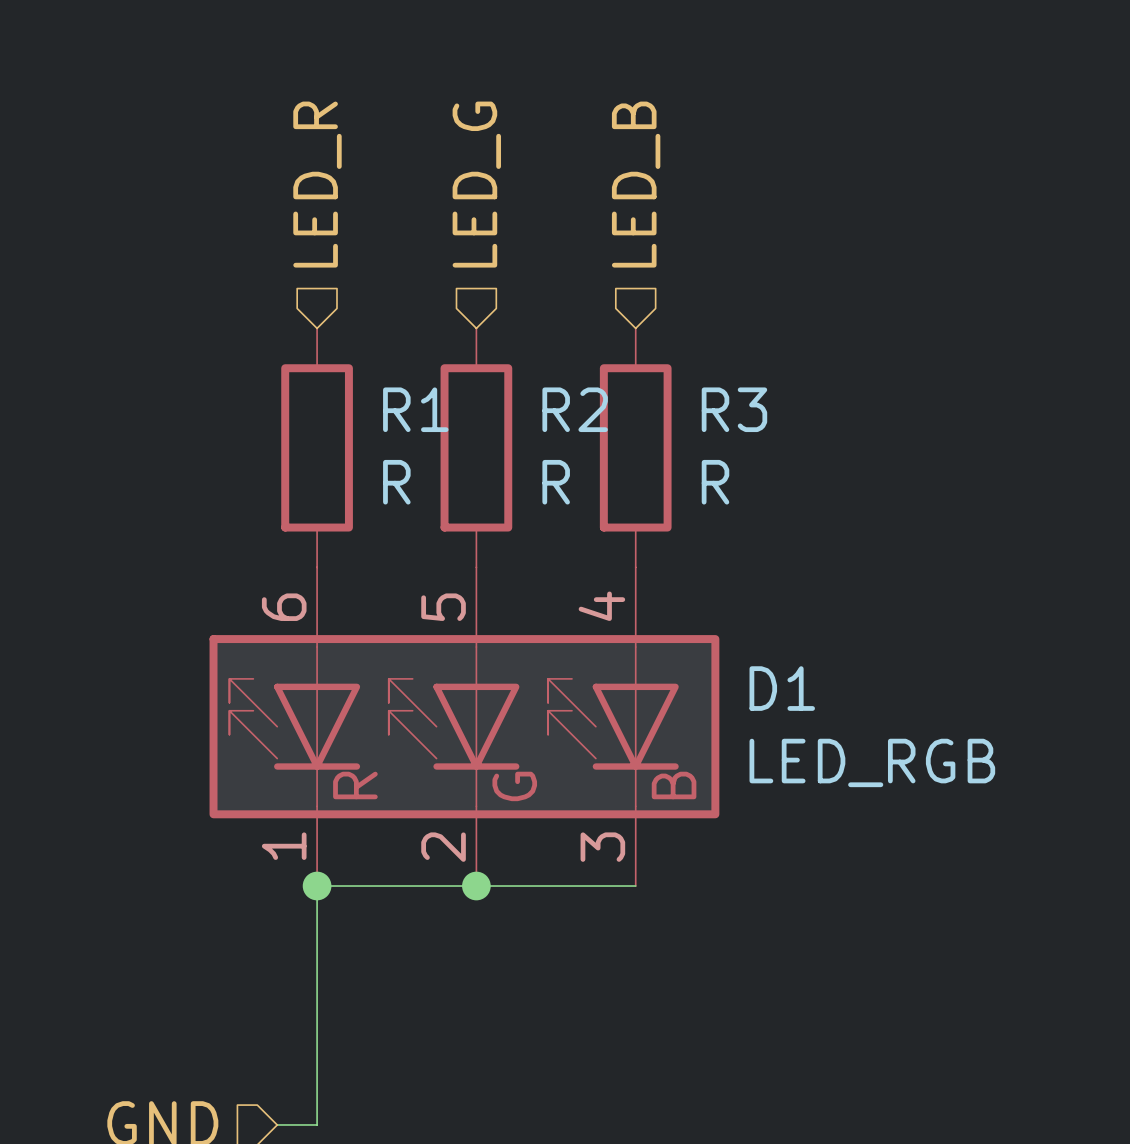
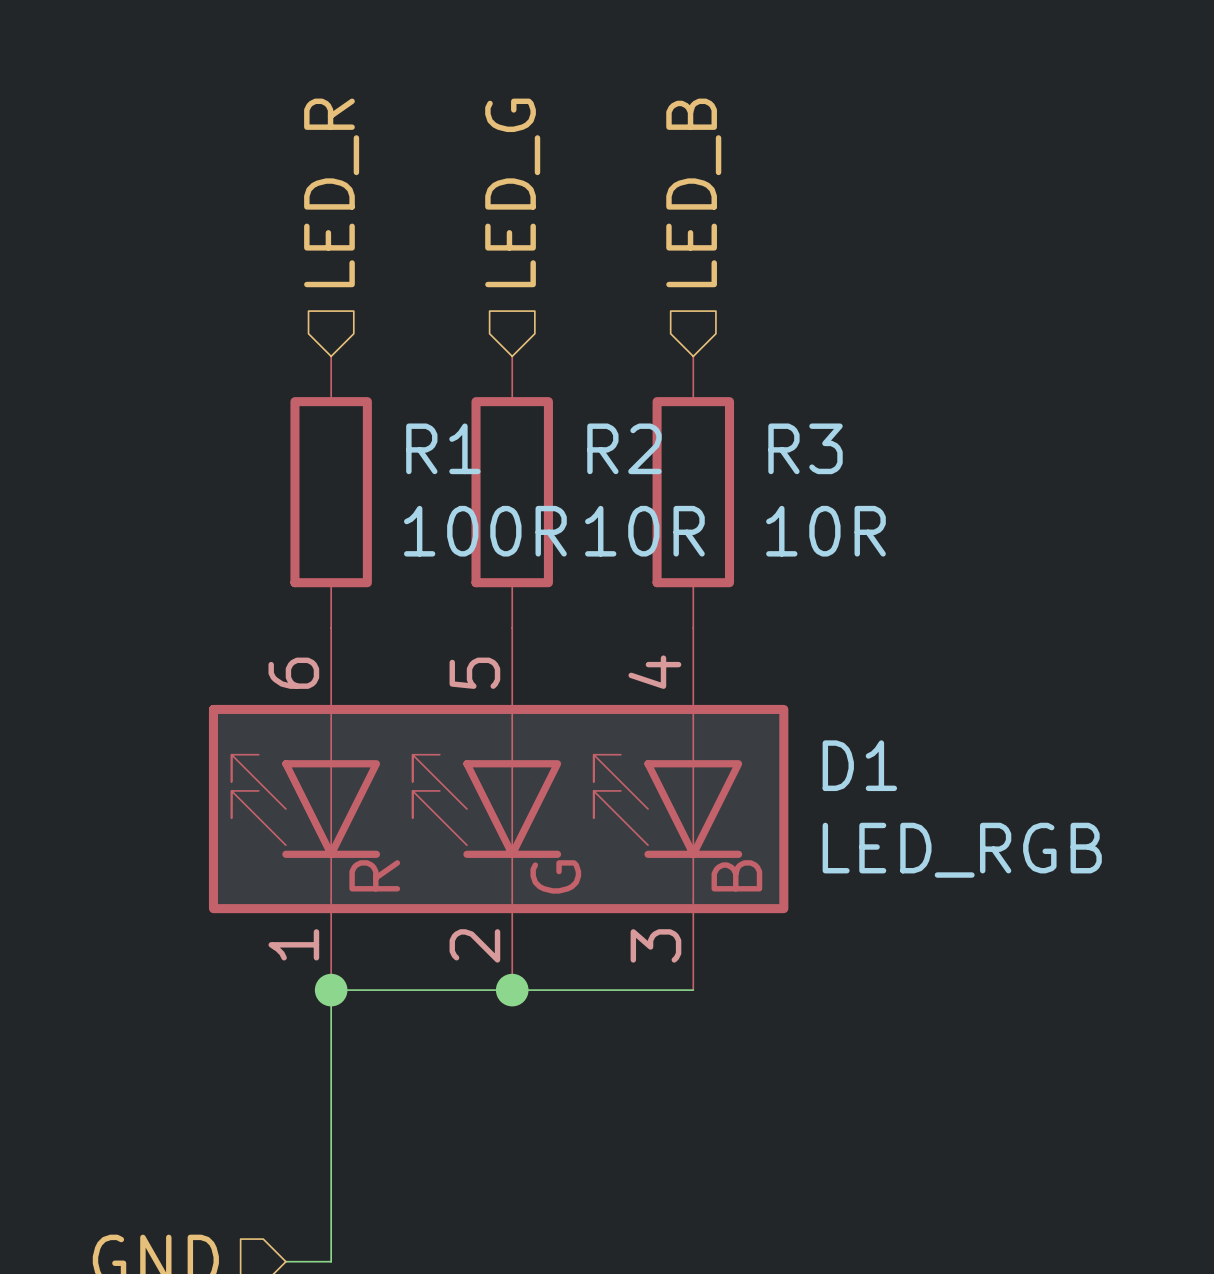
R1 value: R (396, 482) -> 100R (485, 531)
R2 value: R (556, 482) -> 10R (644, 531)
R3 value: R (715, 482) -> 10R (825, 531)

